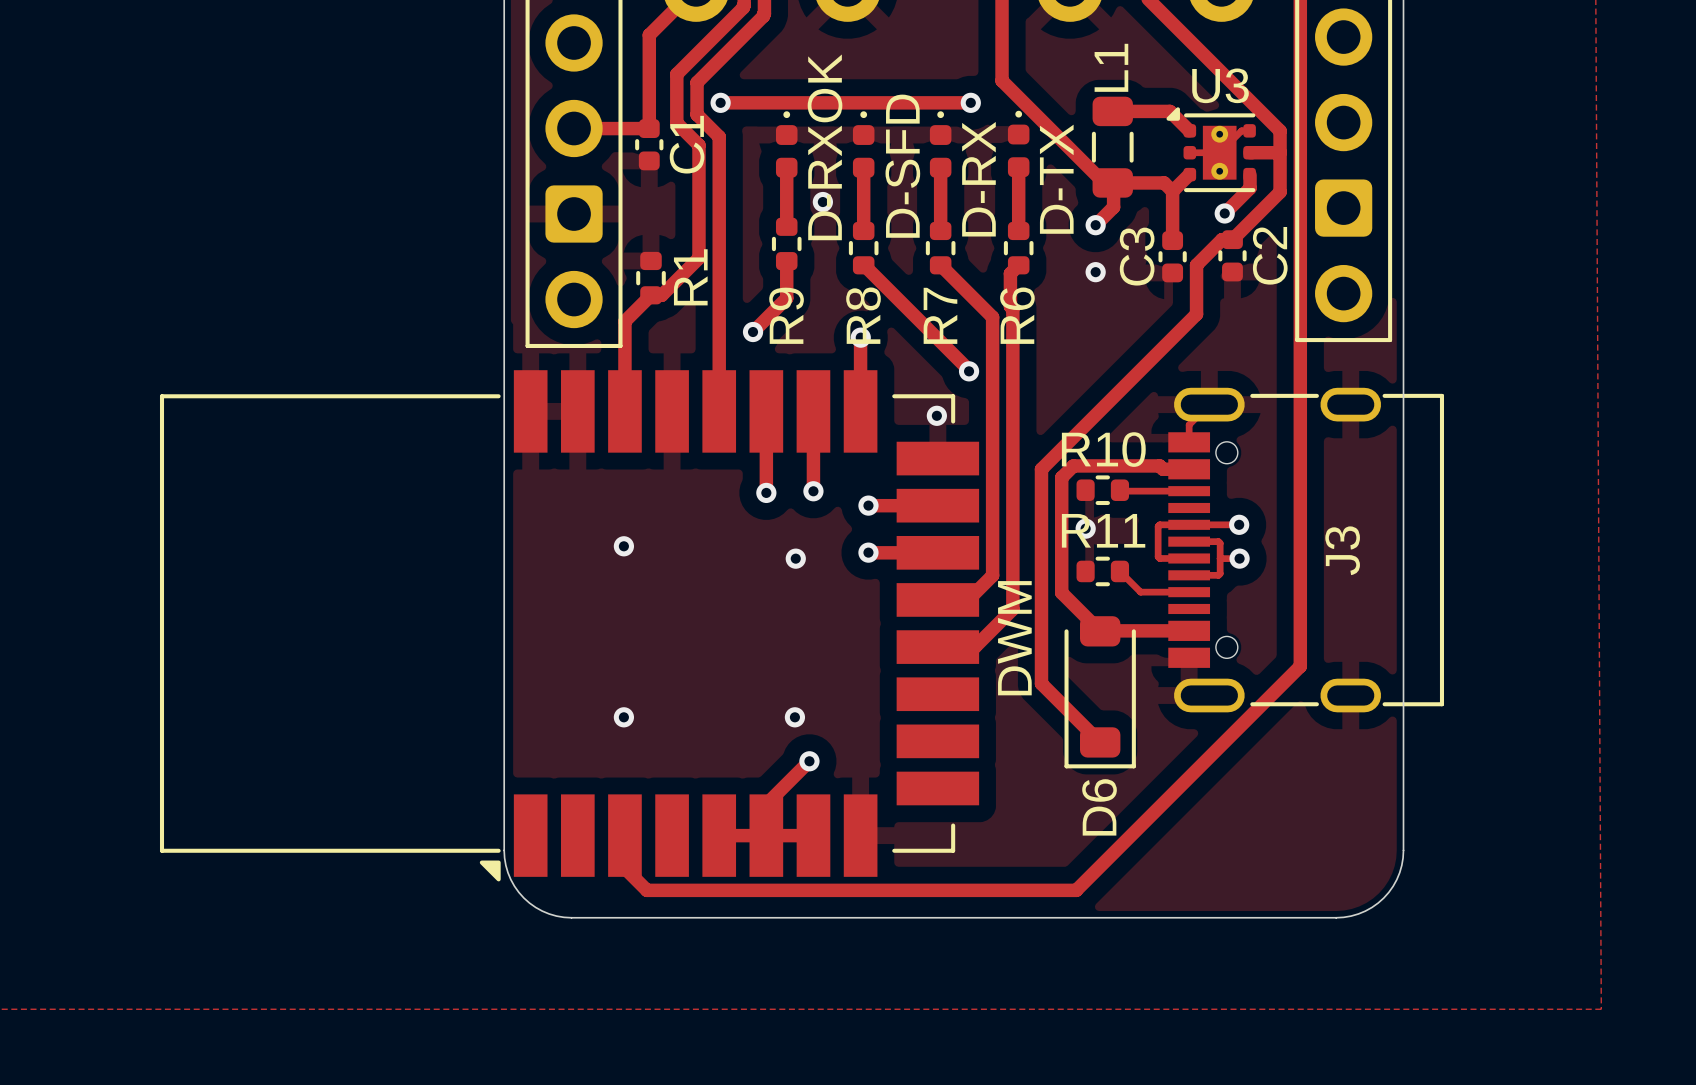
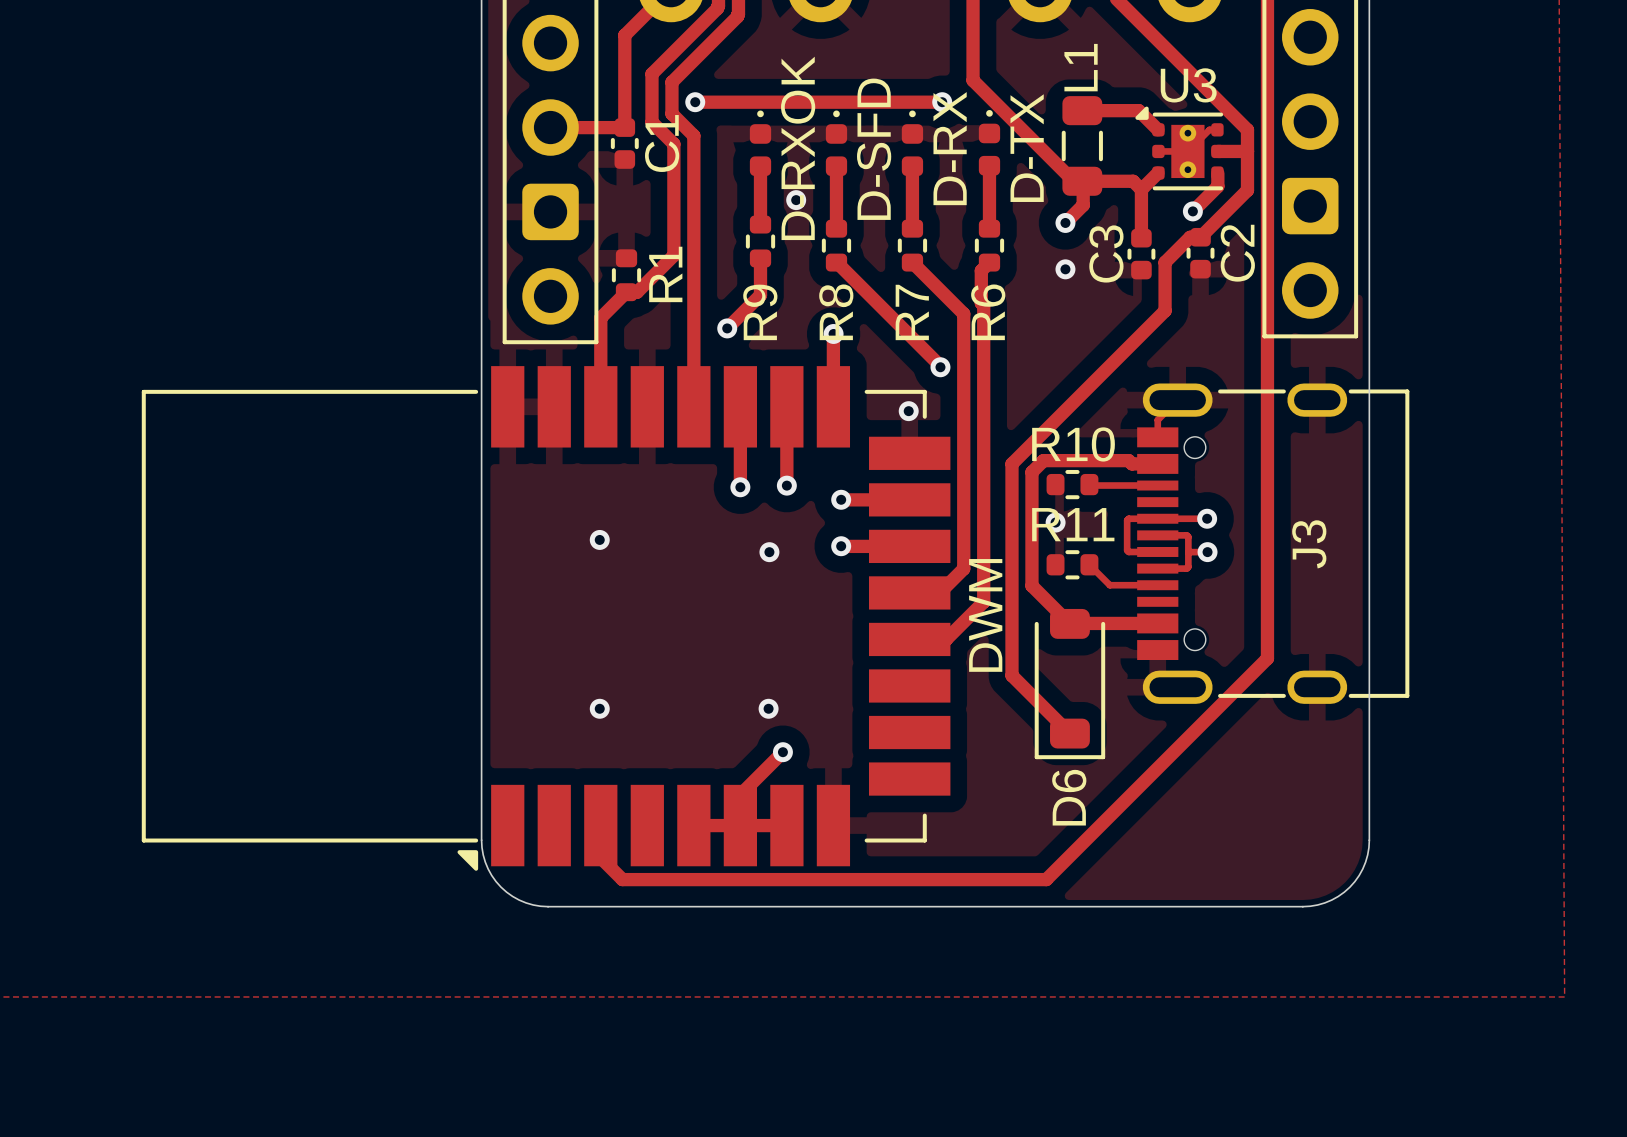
text: D-RXOK (825, 147) -> none
D-RXOK name: none -> D-RXOK (798, 148)
D-RX name: none -> D-RX (950, 148)
D-TX name: none -> D-TX (1027, 148)
D-SFD name: none -> D-SFD (874, 149)
text: D-SFD (902, 166) -> none
text: D-RX (978, 179) -> none
text: D-TX (1056, 179) -> none
DWM name: none -> DWM (985, 615)
text: DWM (1014, 638) -> none

